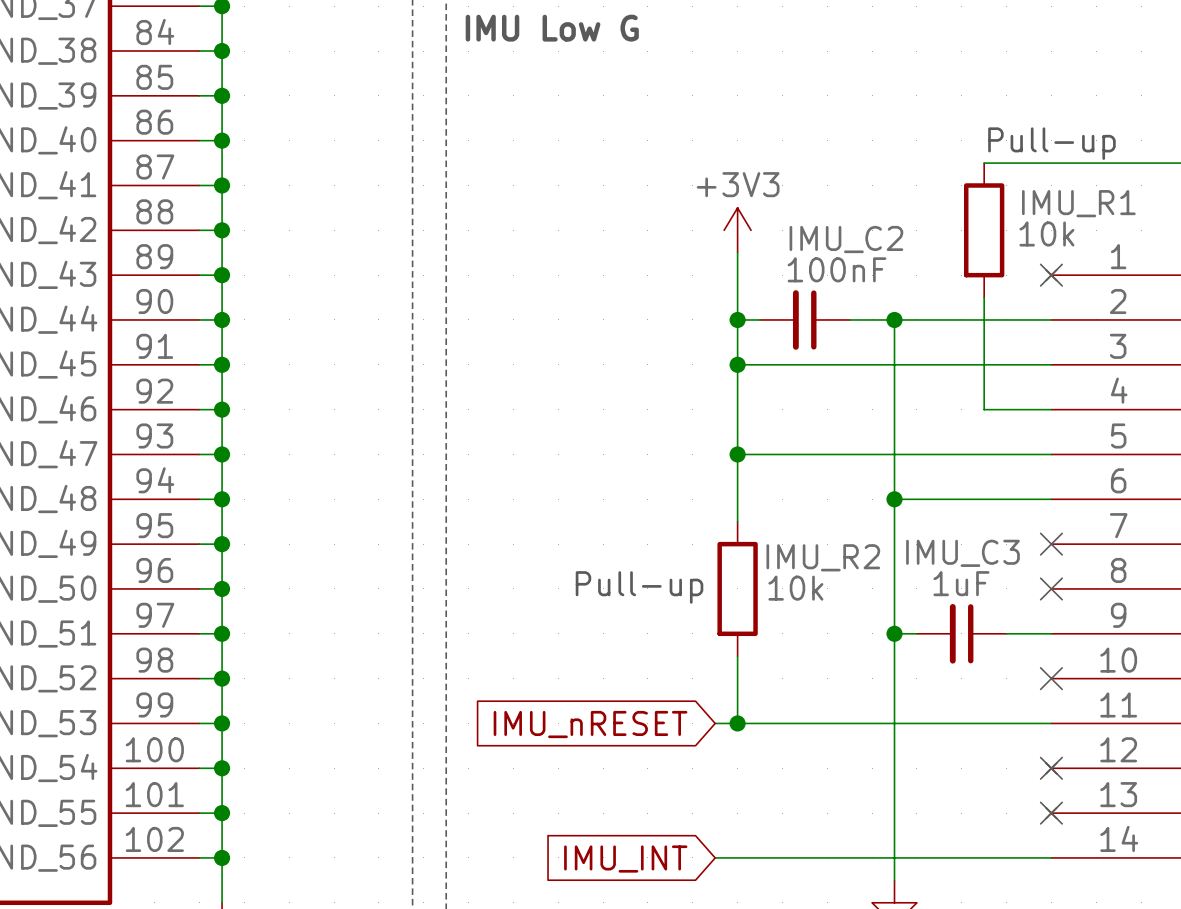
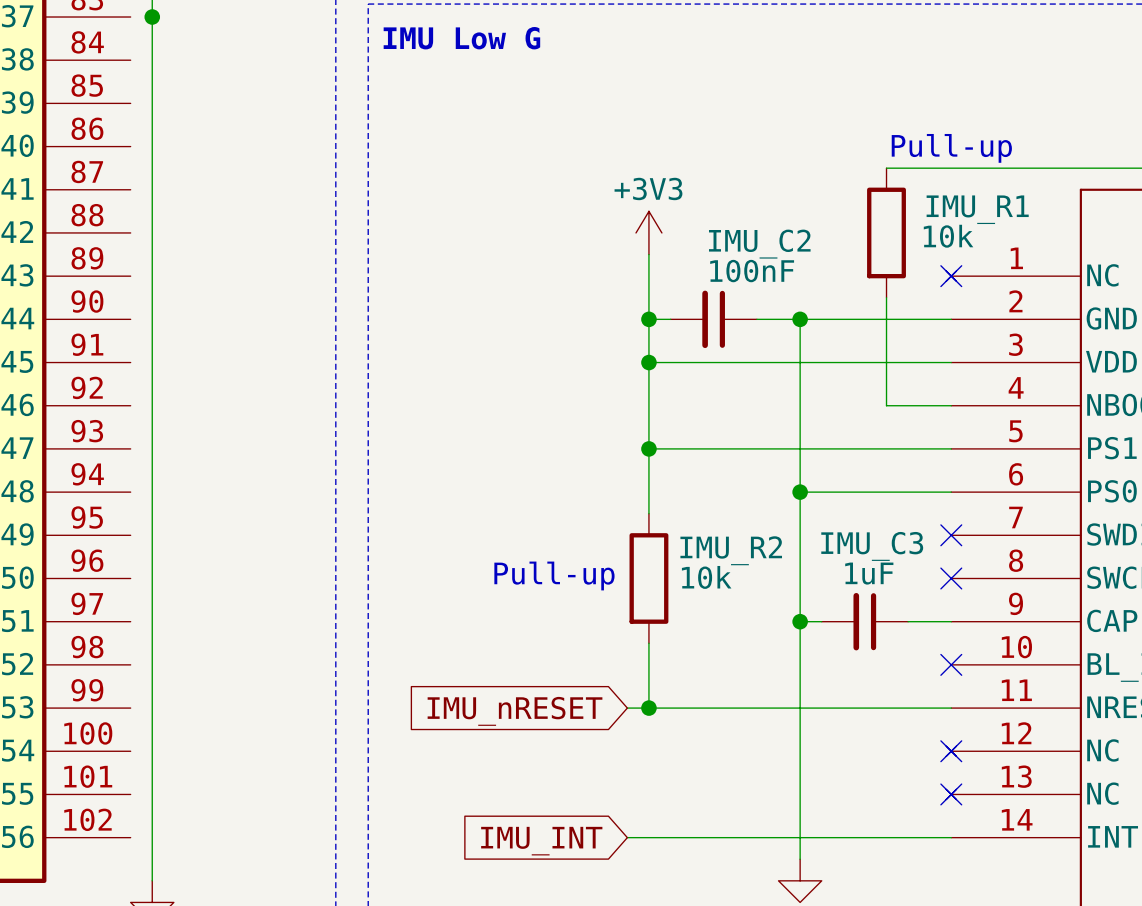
wire: (199, 6) (222, 6) -> none
wire: (199, 51) (222, 51) -> none
junction: (222, 51) -> none
wire: (199, 95) (222, 95) -> none
junction: (222, 95) -> none
wire: (199, 140) (222, 140) -> none
junction: (222, 140) -> none
wire: (199, 185) (222, 185) -> none
junction: (222, 185) -> none
wire: (199, 230) (222, 230) -> none
junction: (222, 230) -> none
wire: (199, 275) (222, 275) -> none
junction: (222, 275) -> none
wire: (199, 319) (222, 319) -> none
junction: (222, 319) -> none
wire: (199, 364) (222, 364) -> none
junction: (222, 364) -> none
wire: (199, 409) (222, 409) -> none
junction: (222, 409) -> none
wire: (199, 454) (222, 454) -> none
junction: (222, 454) -> none
wire: (199, 499) (222, 499) -> none
junction: (222, 499) -> none
wire: (199, 544) (222, 544) -> none
junction: (222, 544) -> none
wire: (199, 588) (222, 588) -> none
junction: (222, 588) -> none
wire: (199, 633) (222, 633) -> none
junction: (222, 633) -> none
wire: (199, 678) (222, 678) -> none
junction: (222, 678) -> none
wire: (199, 723) (222, 723) -> none
junction: (222, 723) -> none
wire: (199, 768) (222, 768) -> none
junction: (222, 768) -> none
wire: (199, 813) (222, 813) -> none
junction: (222, 813) -> none
wire: (199, 857) (222, 857) -> none
junction: (222, 857) -> none

